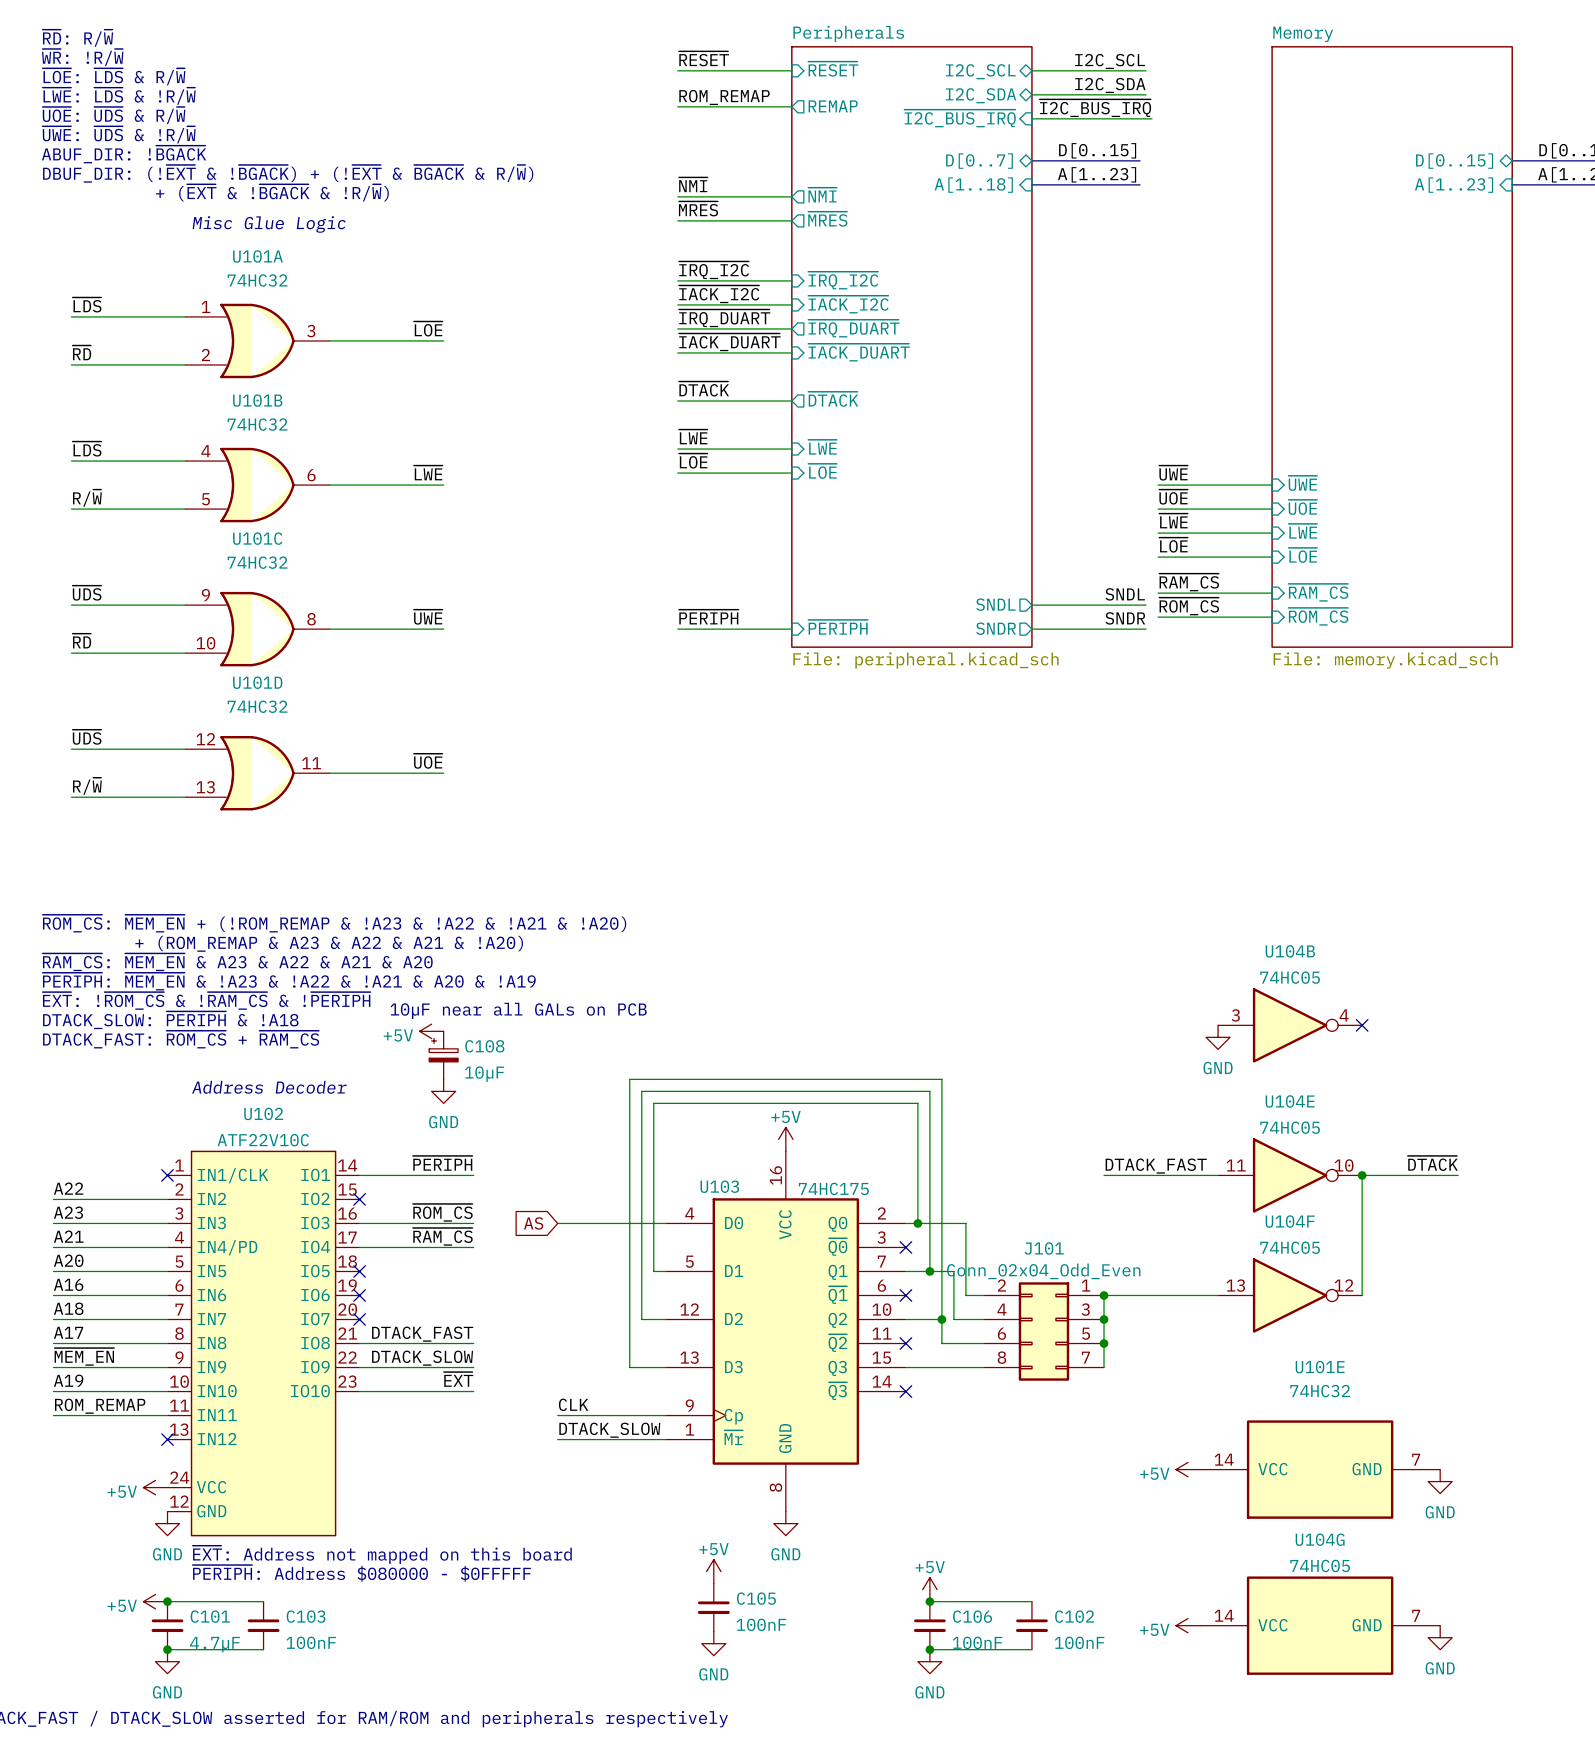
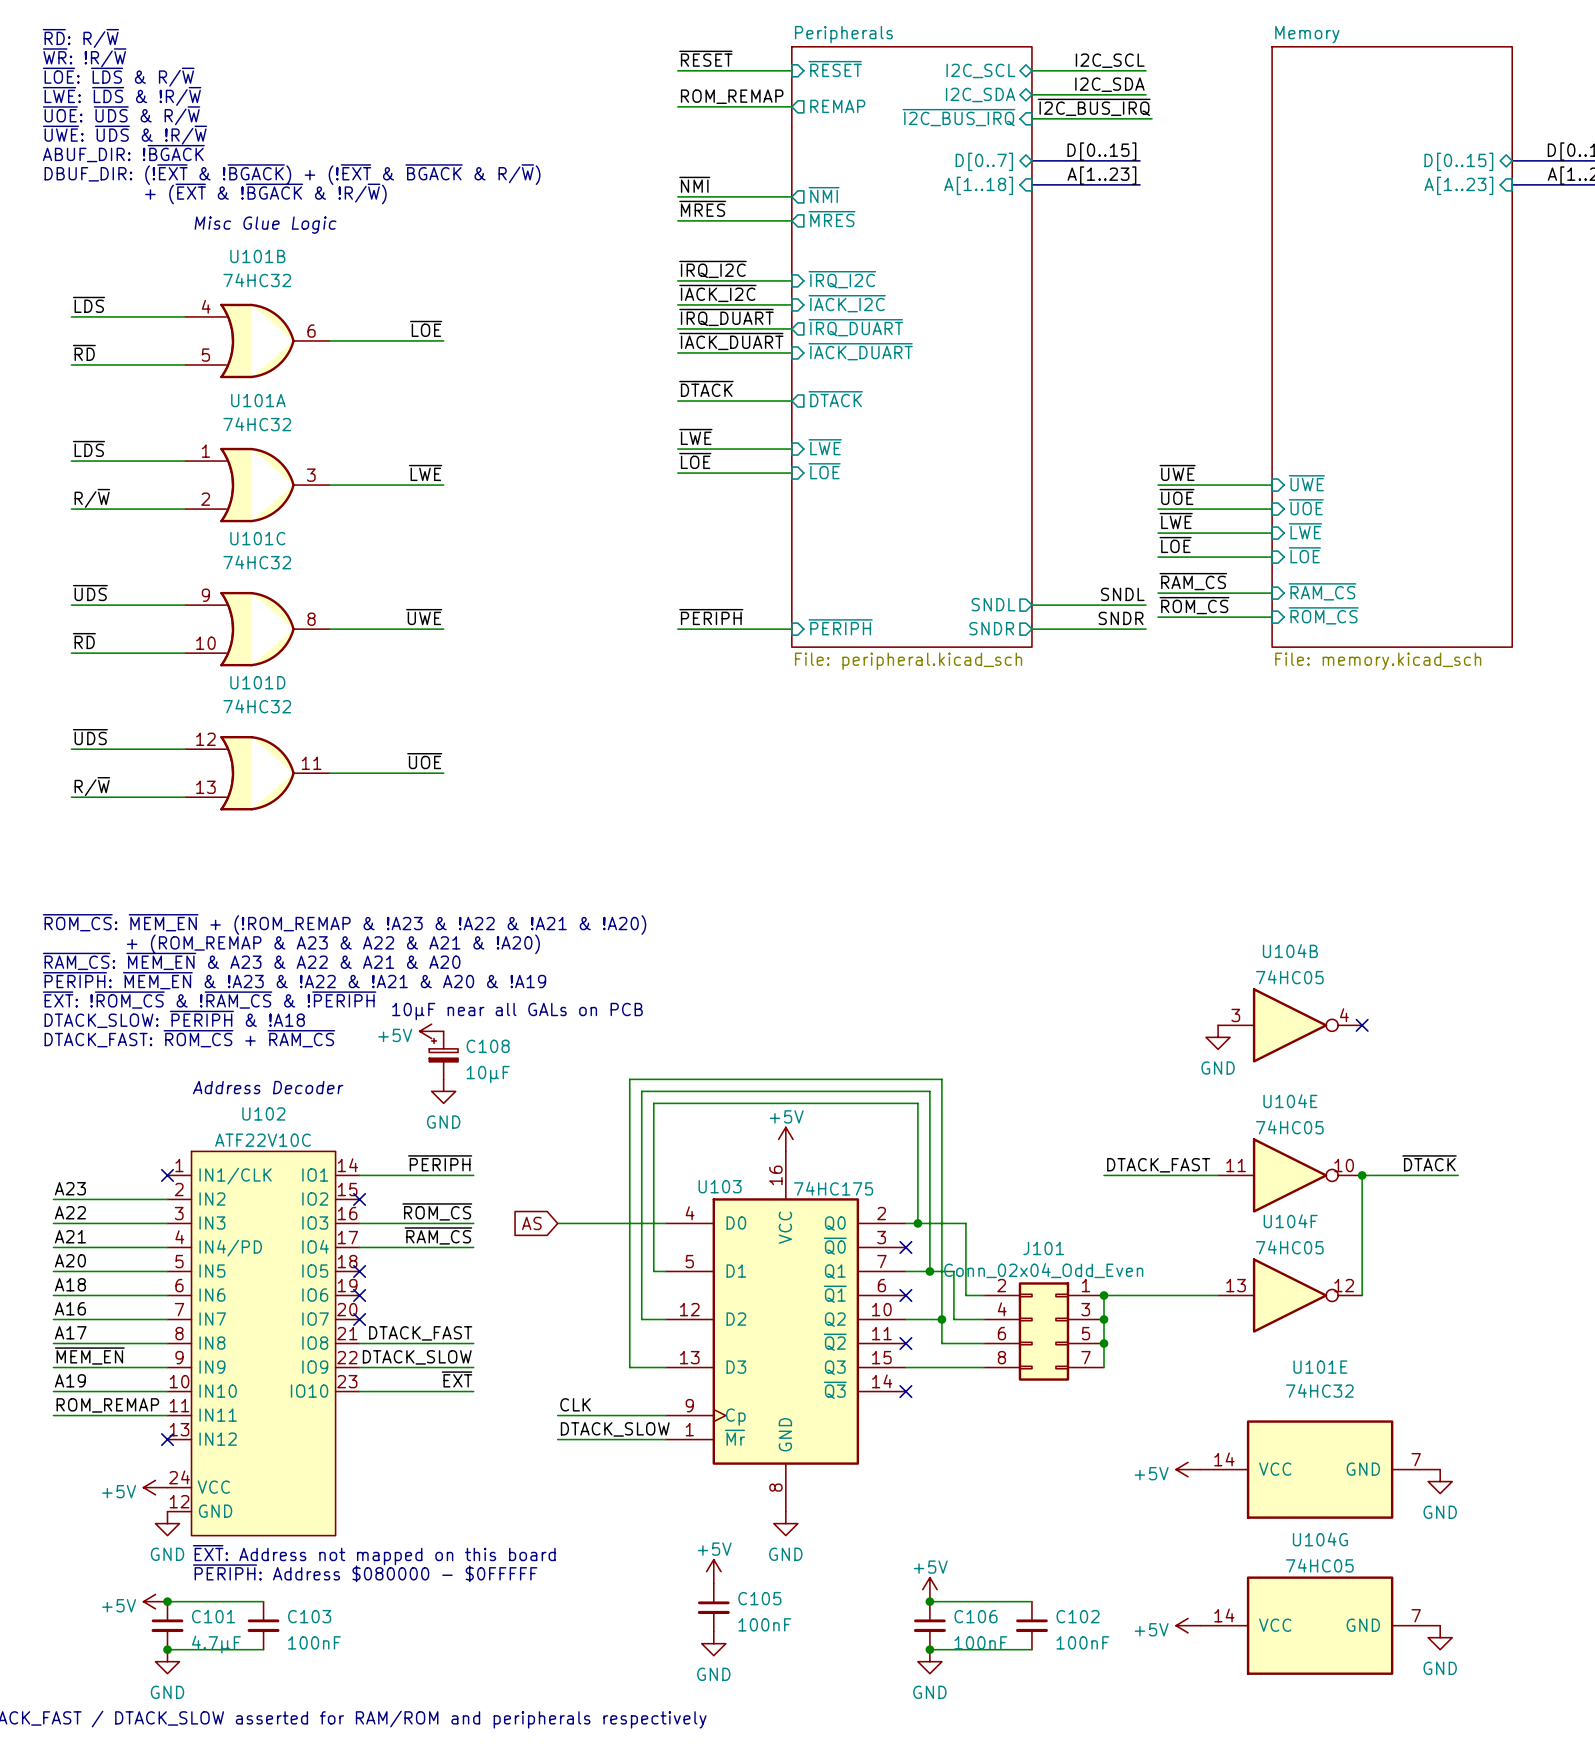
U101A position: (257, 340) -> (257, 485)
U101B position: (257, 485) -> (257, 340)
label: A22 (68, 1188) -> A23 (70, 1188)
label: A23 (68, 1212) -> A22 (70, 1212)
label: A16 (68, 1284) -> A18 (70, 1284)
label: A18 (68, 1308) -> A16 (70, 1308)

